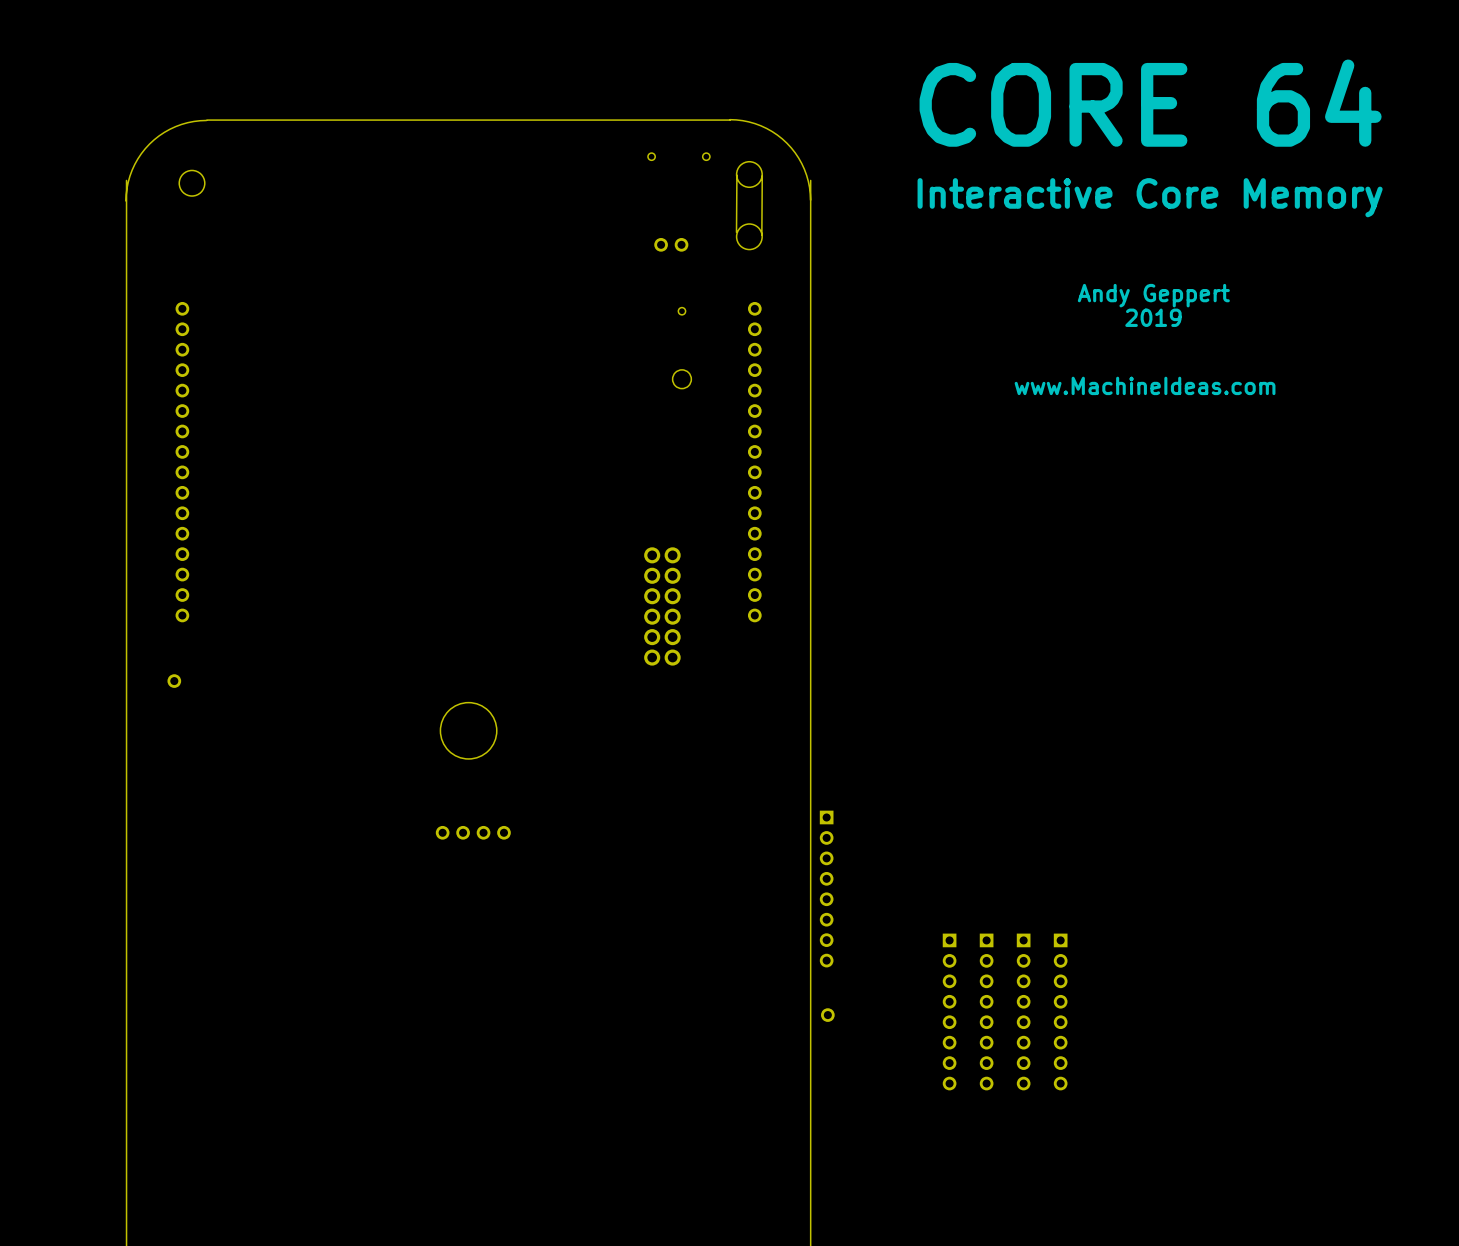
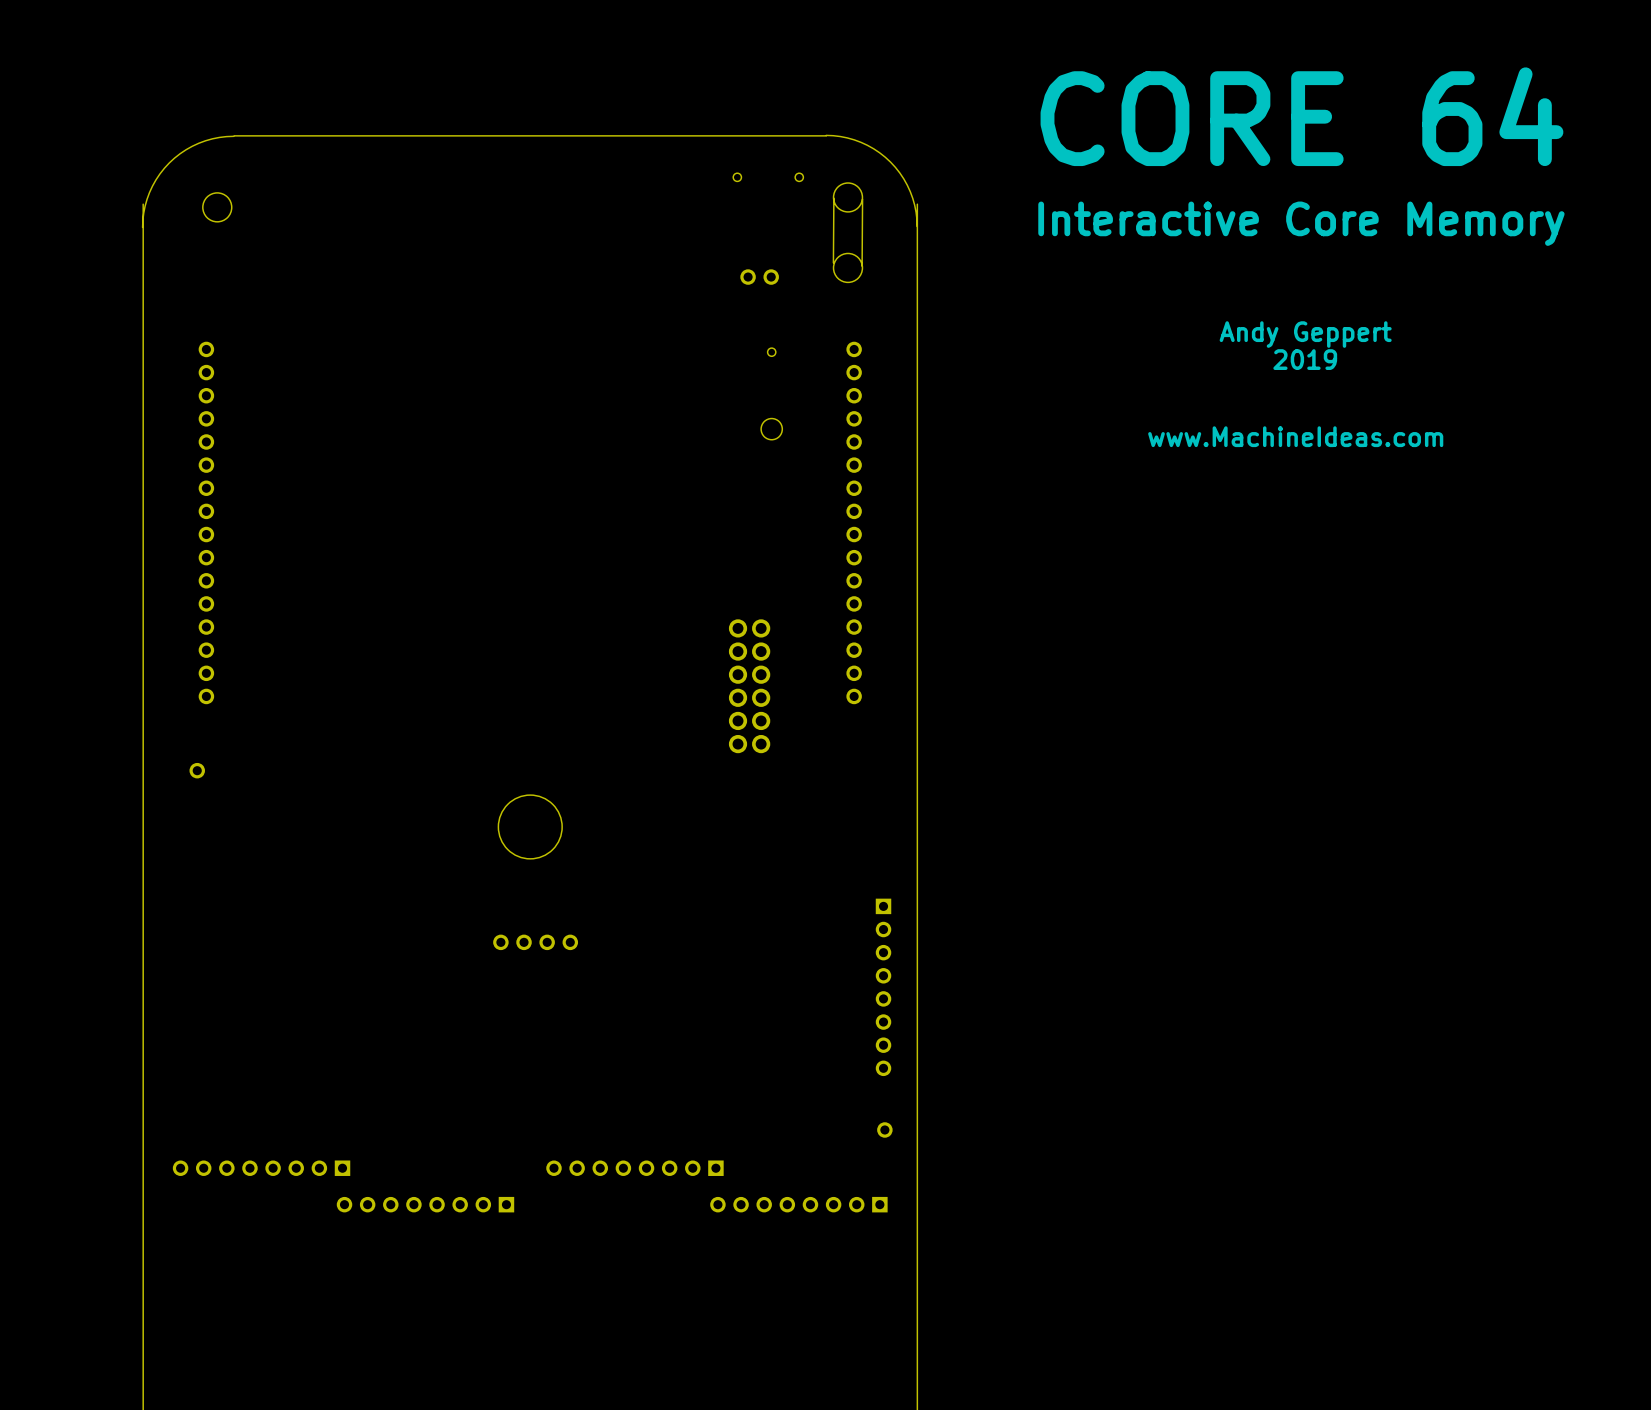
part position: (826, 889) -> (883, 987)
part: (949, 1011) -> none
part: (986, 1011) -> none
part: (1023, 1011) -> none
part: (1060, 1011) -> none
part position: (827, 1015) -> (884, 1129)
part: none -> (261, 1168)
part: none -> (634, 1168)
part: none -> (425, 1204)
part: none -> (798, 1204)

